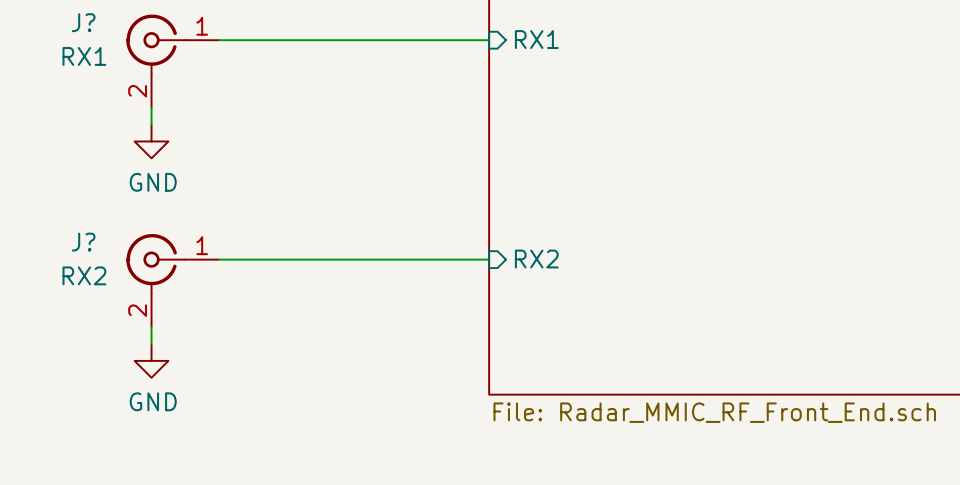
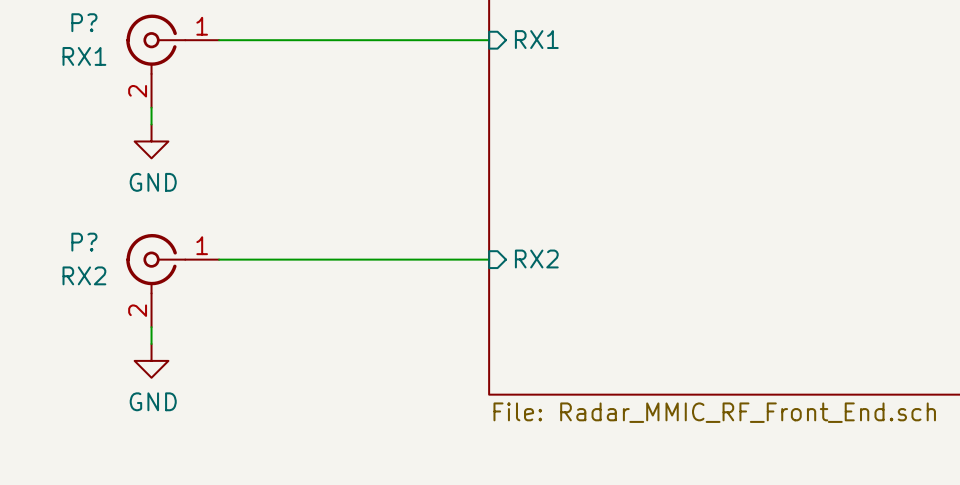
J? name: J? (83, 22) -> P? (84, 22)
J? name: J? (83, 242) -> P? (84, 242)

